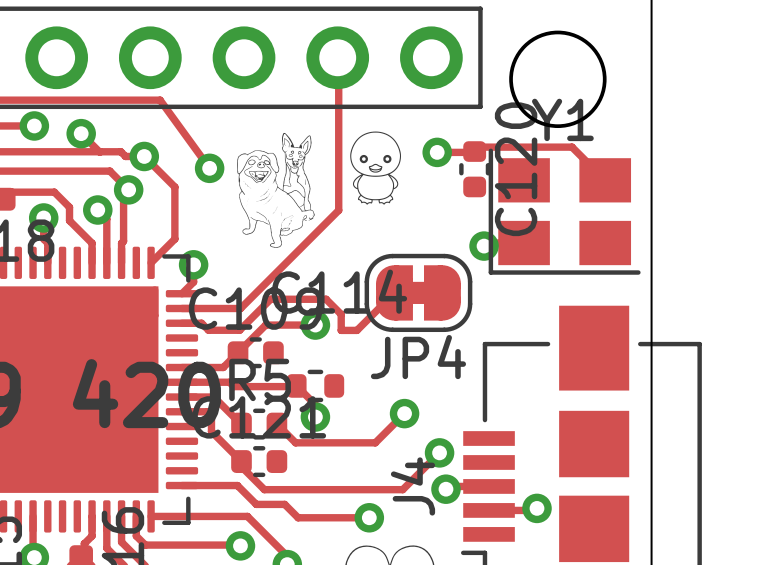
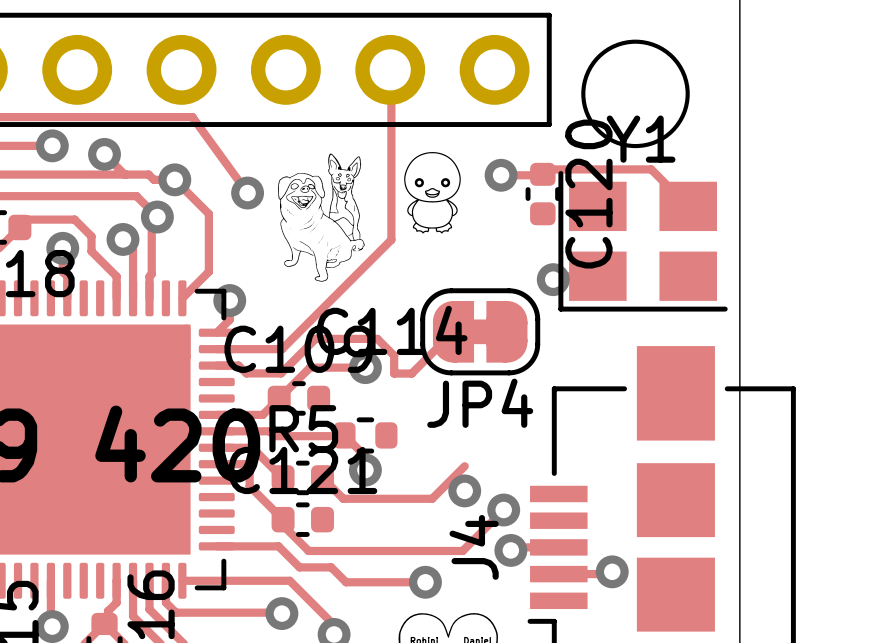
via position: (404, 413) -> (464, 490)

